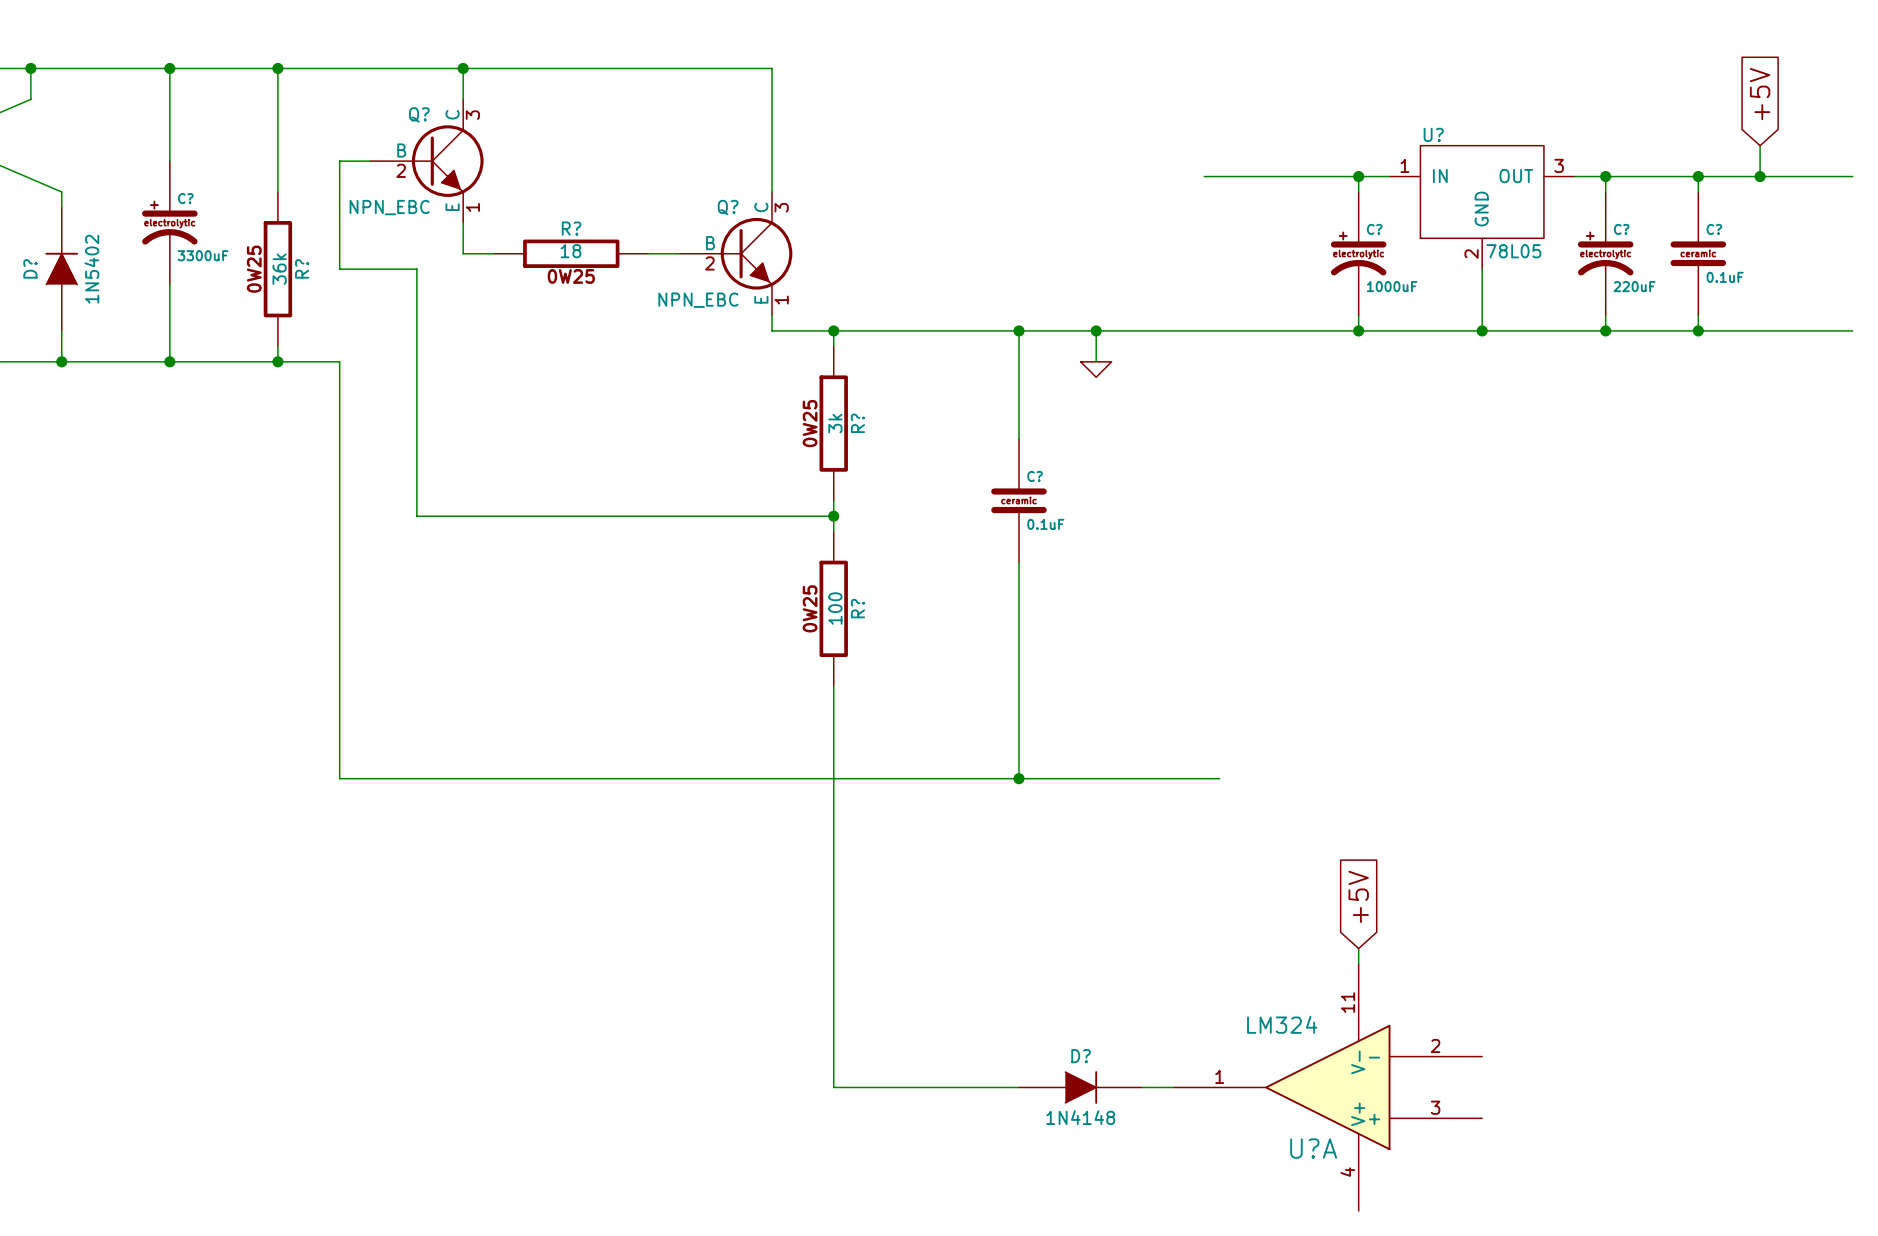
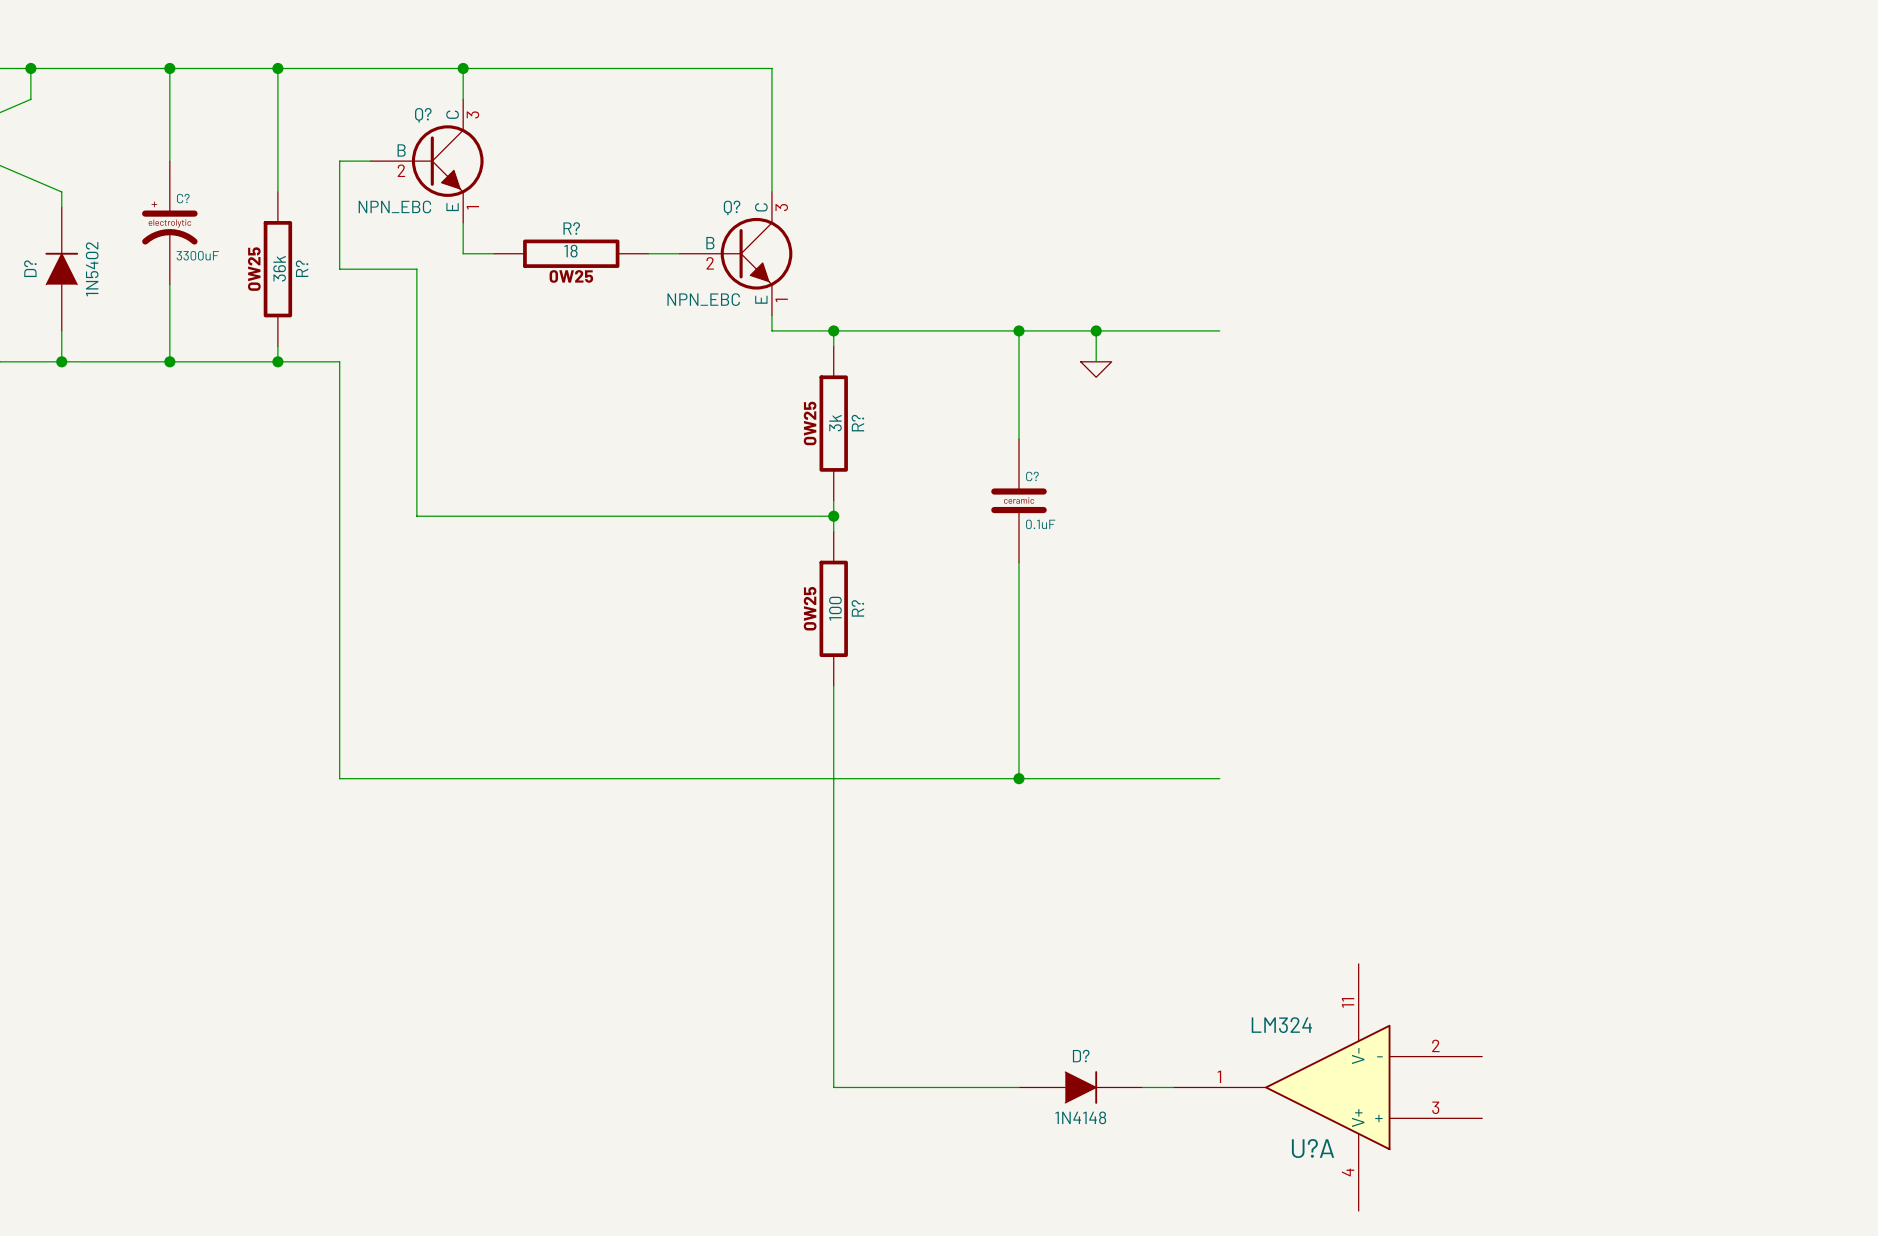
global label: +5V (1760, 94) -> none
wire: (1760, 145) (1760, 176) -> none
wire: (1204, 176) (1389, 176) -> none
wire: (1358, 176) (1358, 191) -> none
junction: (1358, 176) -> none
wire: (1574, 176) (1852, 176) -> none
wire: (1605, 176) (1605, 191) -> none
junction: (1605, 176) -> none
wire: (1698, 176) (1698, 191) -> none
junction: (1698, 176) -> none
junction: (1760, 176) -> none
U?: 78L05 (1482, 207) -> none
C?: 1000uF (1358, 253) -> none
C?: 220uF (1605, 253) -> none
C?: 0.1uF (1698, 253) -> none
wire: (1482, 269) (1482, 330) -> none
wire: (1358, 315) (1358, 330) -> none
wire: (1605, 315) (1605, 330) -> none
wire: (1698, 315) (1698, 330) -> none
wire: (1219, 330) (1852, 330) -> none
junction: (1358, 330) -> none
junction: (1482, 330) -> none
junction: (1605, 330) -> none
junction: (1698, 330) -> none
global label: +5V (1358, 896) -> none
wire: (1358, 948) (1358, 963) -> none

